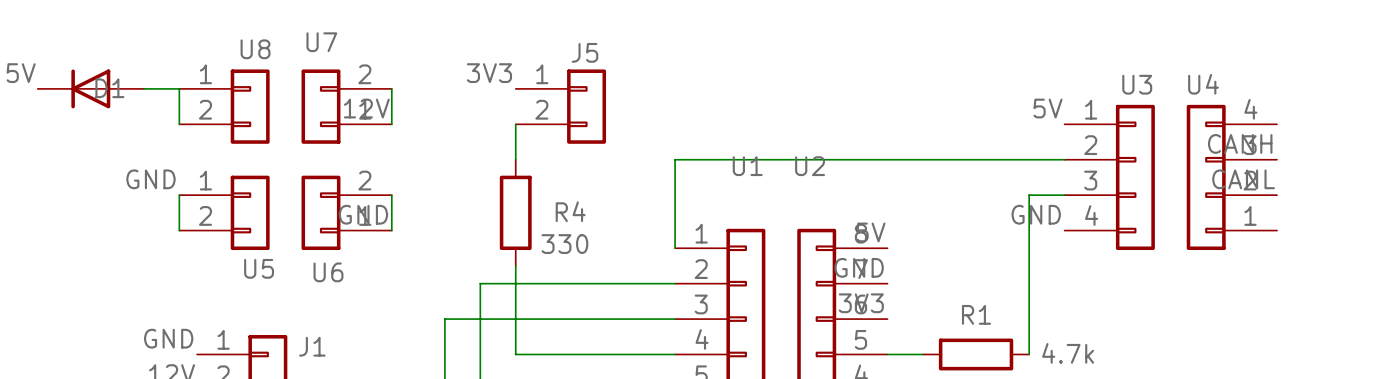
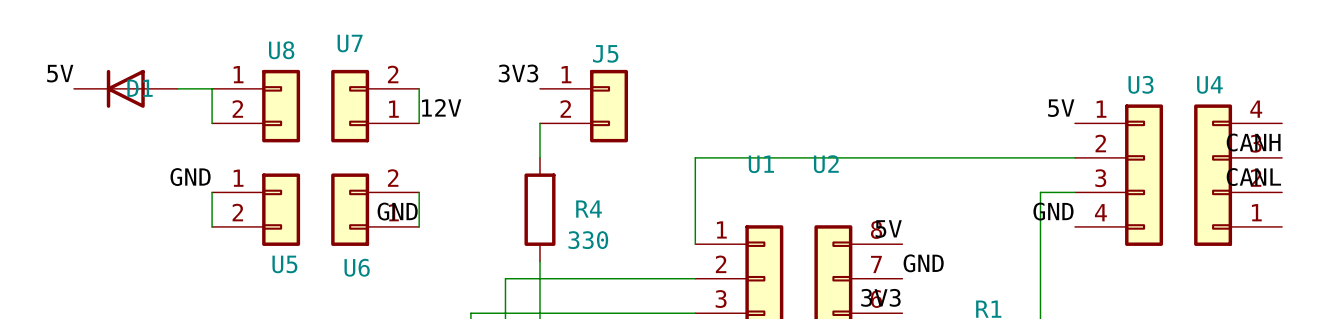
label position: 12V (366, 108) -> 12V (441, 107)
label position: GND (859, 267) -> GND (923, 263)

